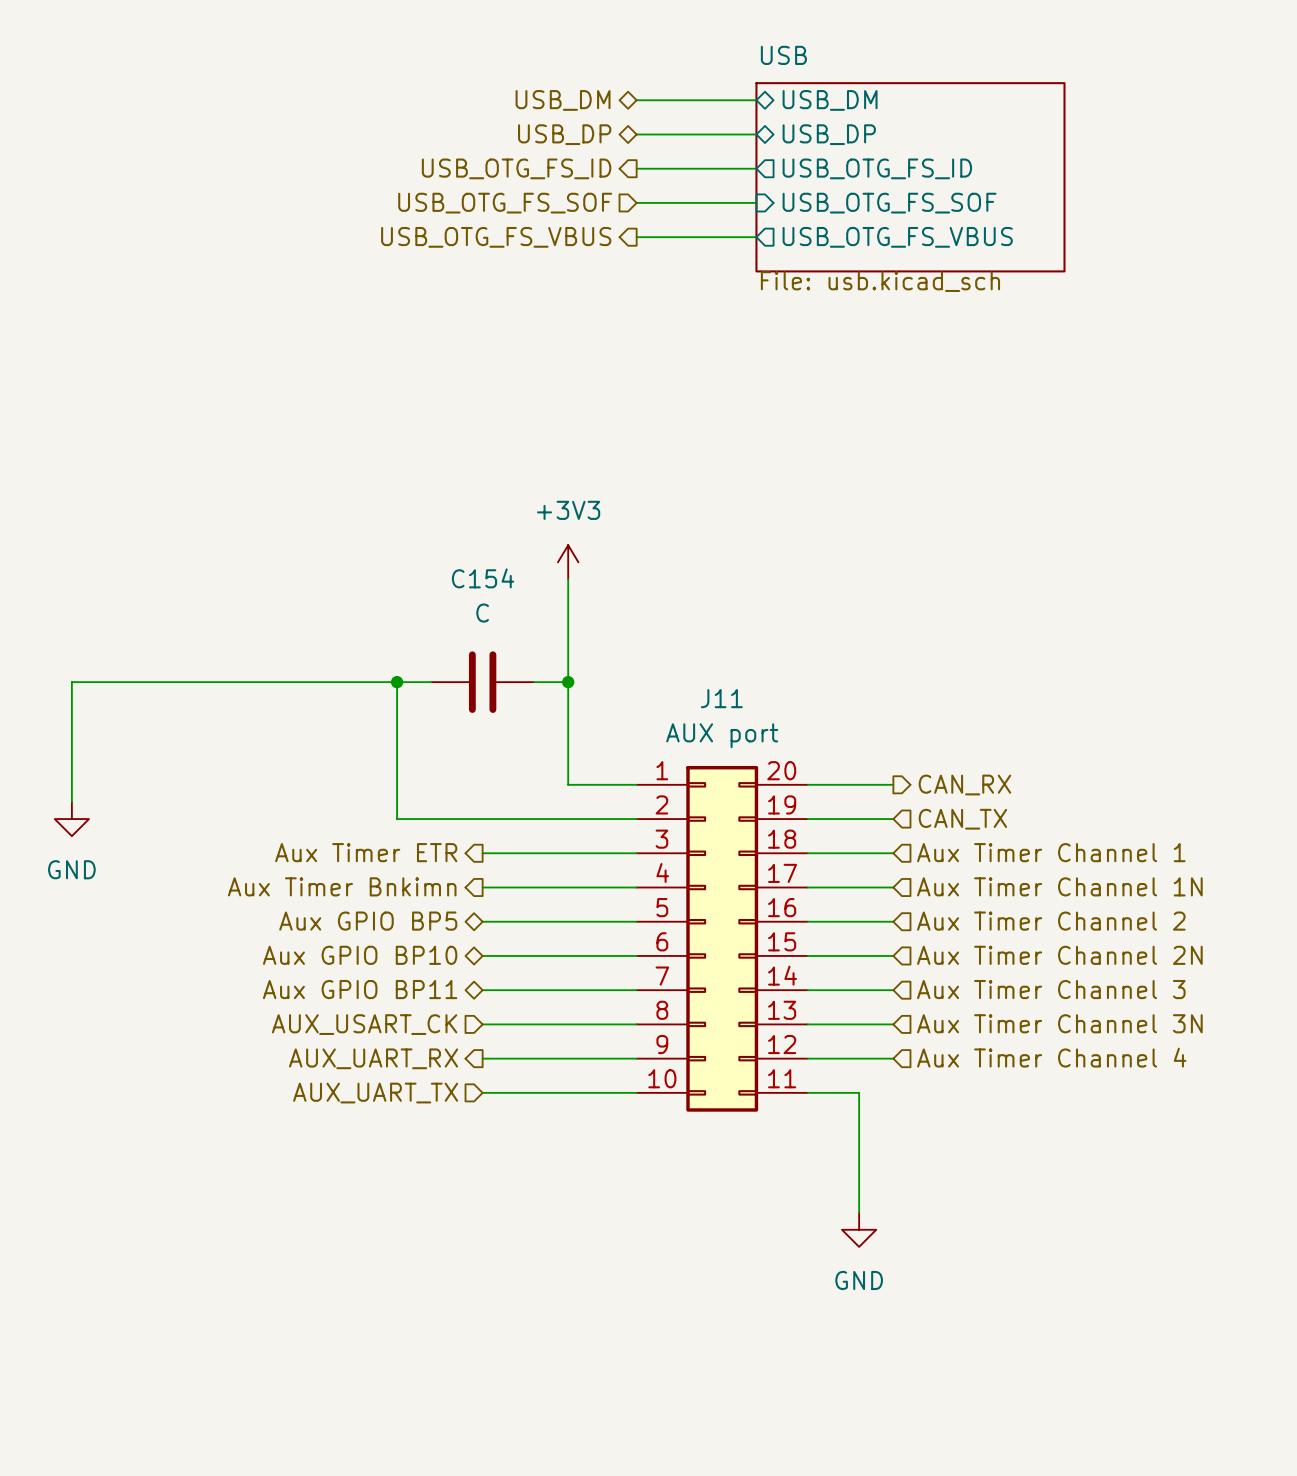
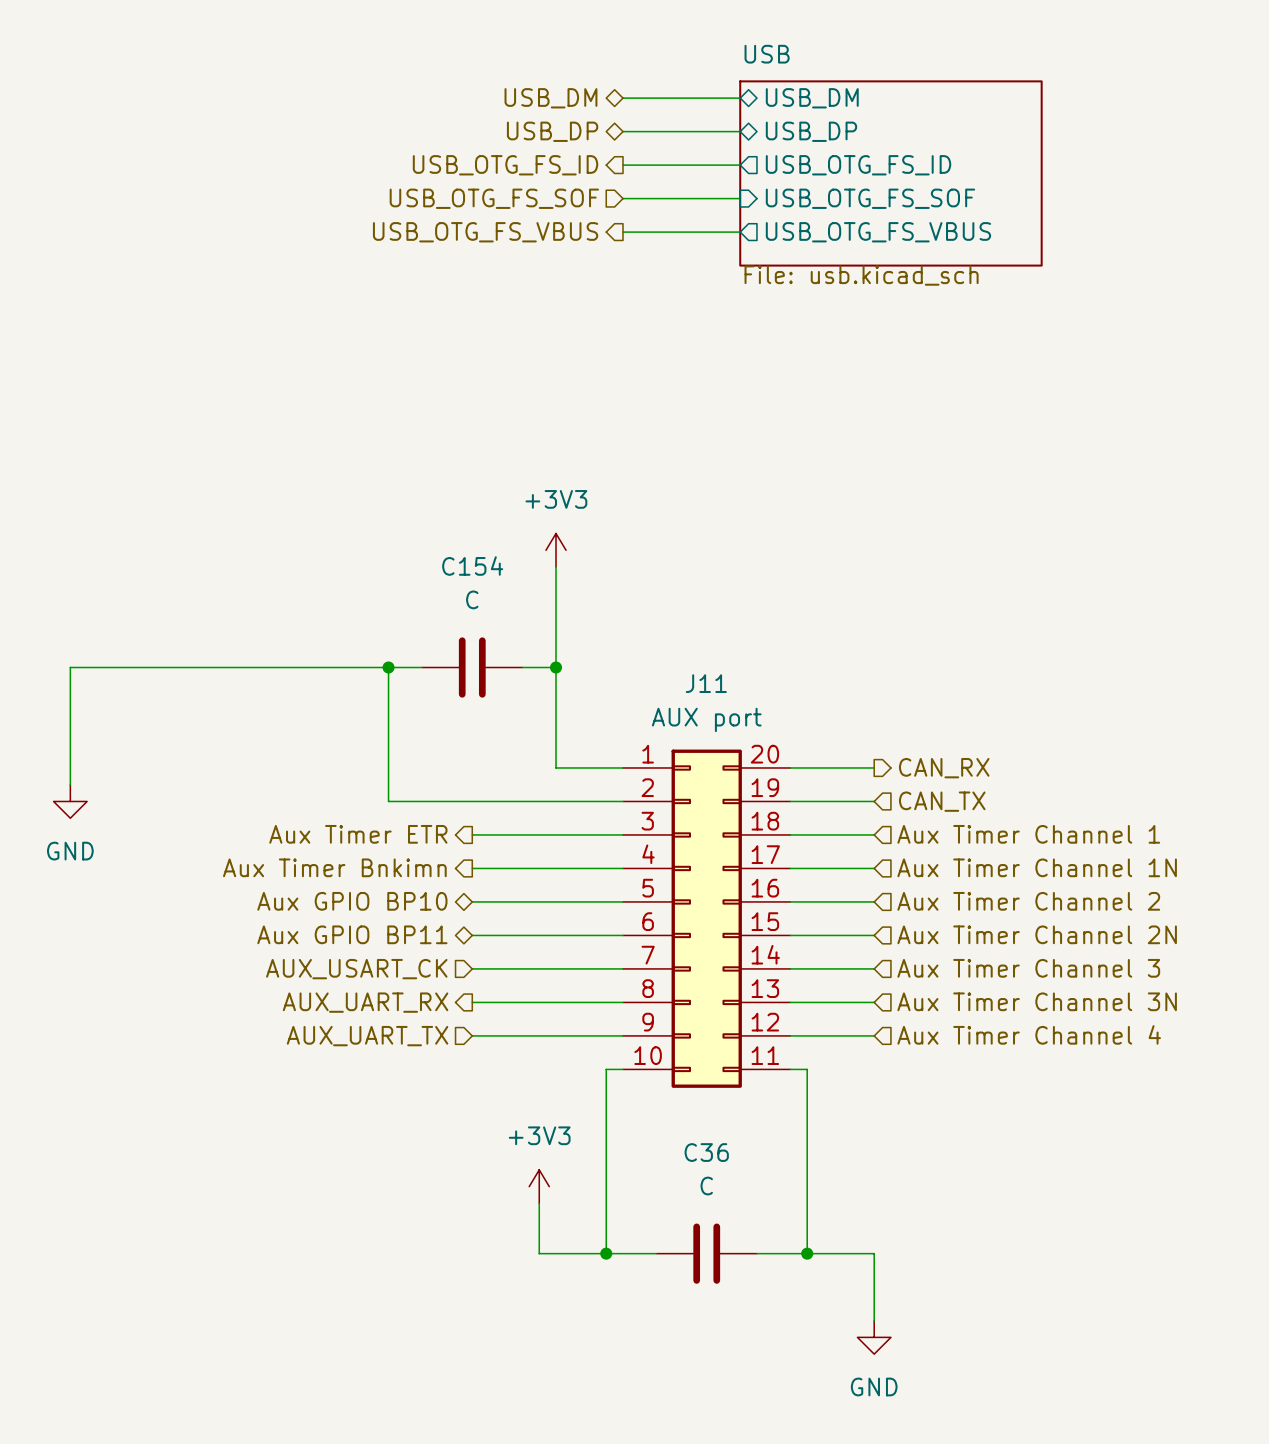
hierarchical label: Aux GPIO BP5 (368, 921) -> Aux GPIO BP10 (352, 901)
hierarchical label: Aux GPIO BP10 (360, 955) -> Aux GPIO BP11 (352, 934)
hierarchical label shape: bidirectional (360, 989) -> input (356, 969)
hierarchical label: Aux GPIO BP11 (360, 989) -> AUX_USART_CK (356, 969)
hierarchical label shape: input (364, 1024) -> output (365, 1002)
hierarchical label: AUX_USART_CK (364, 1024) -> AUX_UART_RX (365, 1002)
hierarchical label shape: output (373, 1058) -> input (367, 1036)
hierarchical label: AUX_UART_RX (373, 1058) -> AUX_UART_TX (367, 1036)
wire: (482, 1092) (619, 1092) -> (606, 1253) (606, 1069)
wire: (824, 1092) (859, 1092) (859, 1212) -> (807, 1069) (807, 1253)
hierarchical label: AUX_UART_TX (375, 1093) -> none
power symbol: none -> +3V3 (539, 1186)
wire: none -> (539, 1203) (539, 1253) (656, 1253)
power symbol position: GND (859, 1229) -> GND (874, 1337)
junction: none -> (606, 1253)
C36: none -> C (706, 1253)
wire: none -> (756, 1253) (874, 1253) (874, 1320)
junction: none -> (807, 1253)

